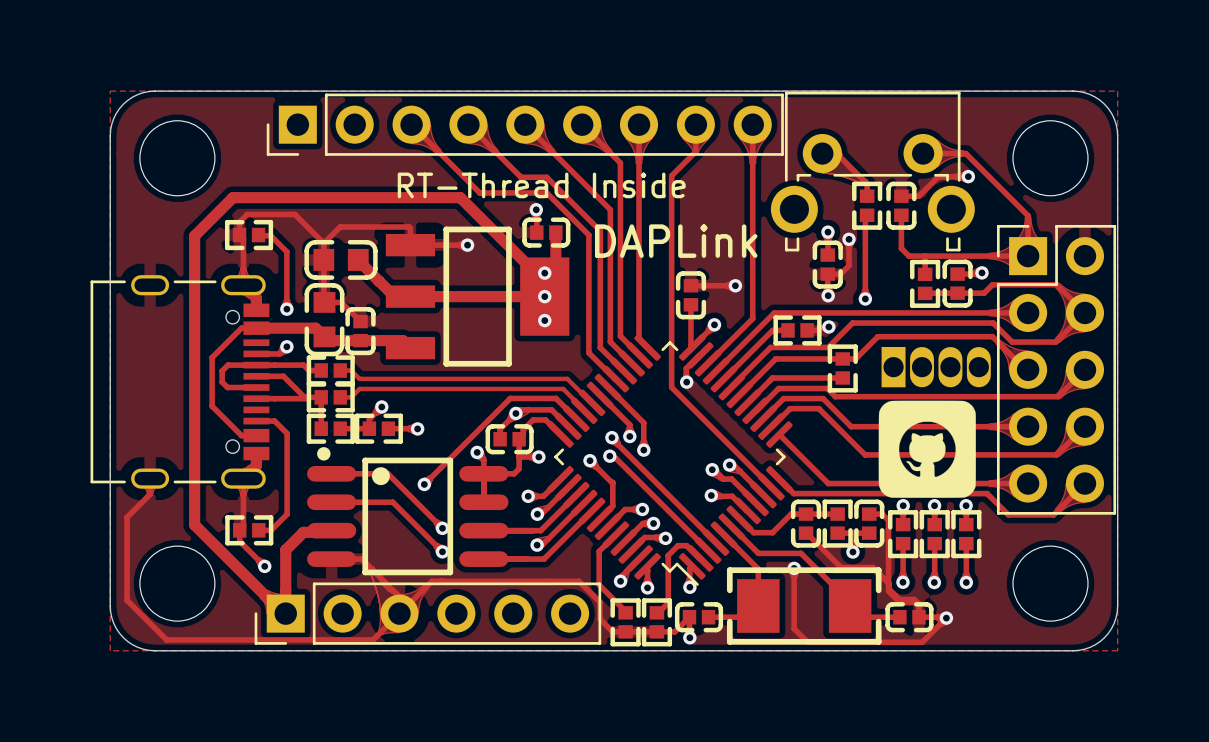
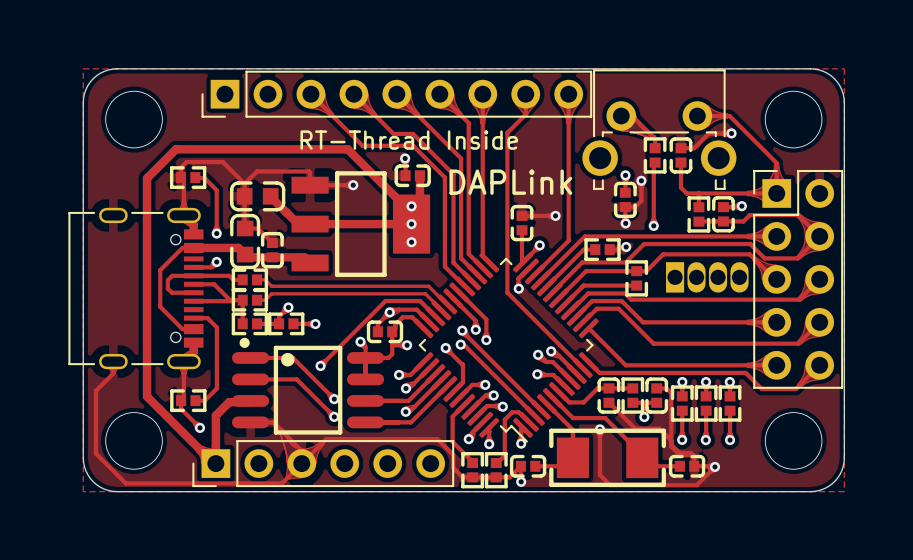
drawing: [878, 400, 976, 498] -> none

